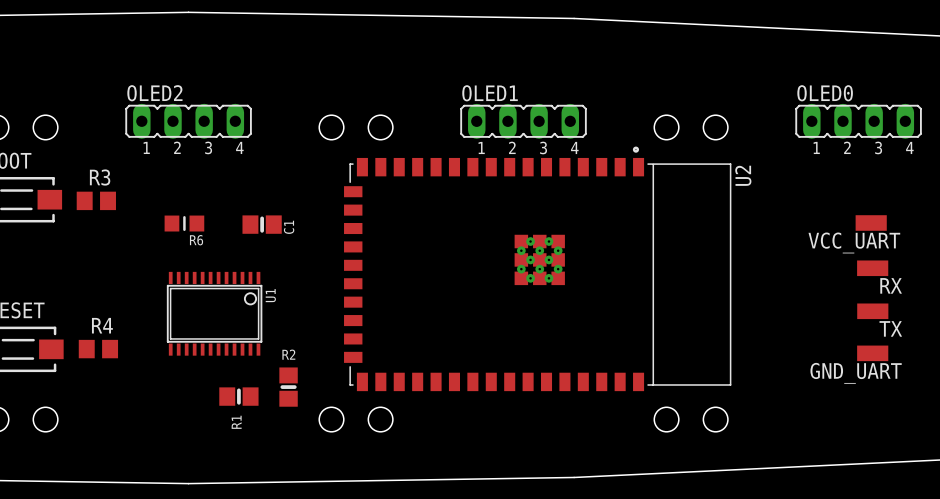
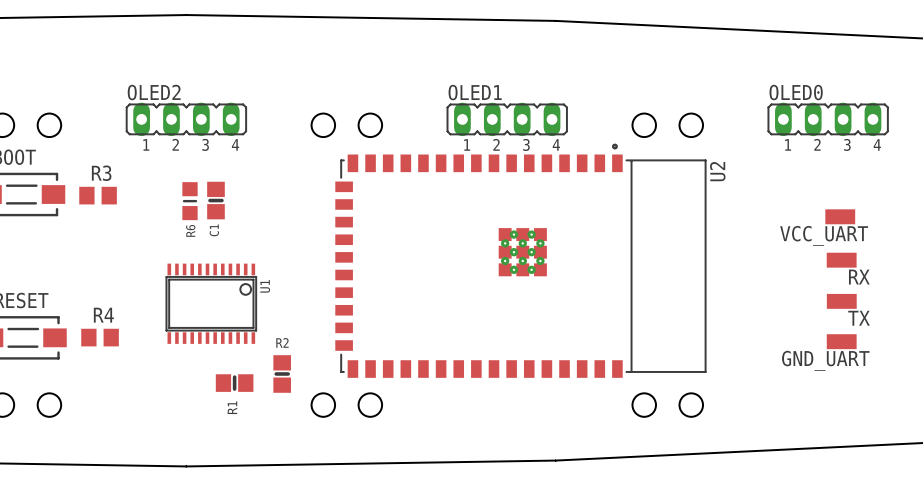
R6 rotation: 0° (184, 223) -> 90° clockwise (190, 201)
C1 rotation: 0° (262, 224) -> 90° clockwise (215, 200)
C1 position: (262, 224) -> (215, 200)

